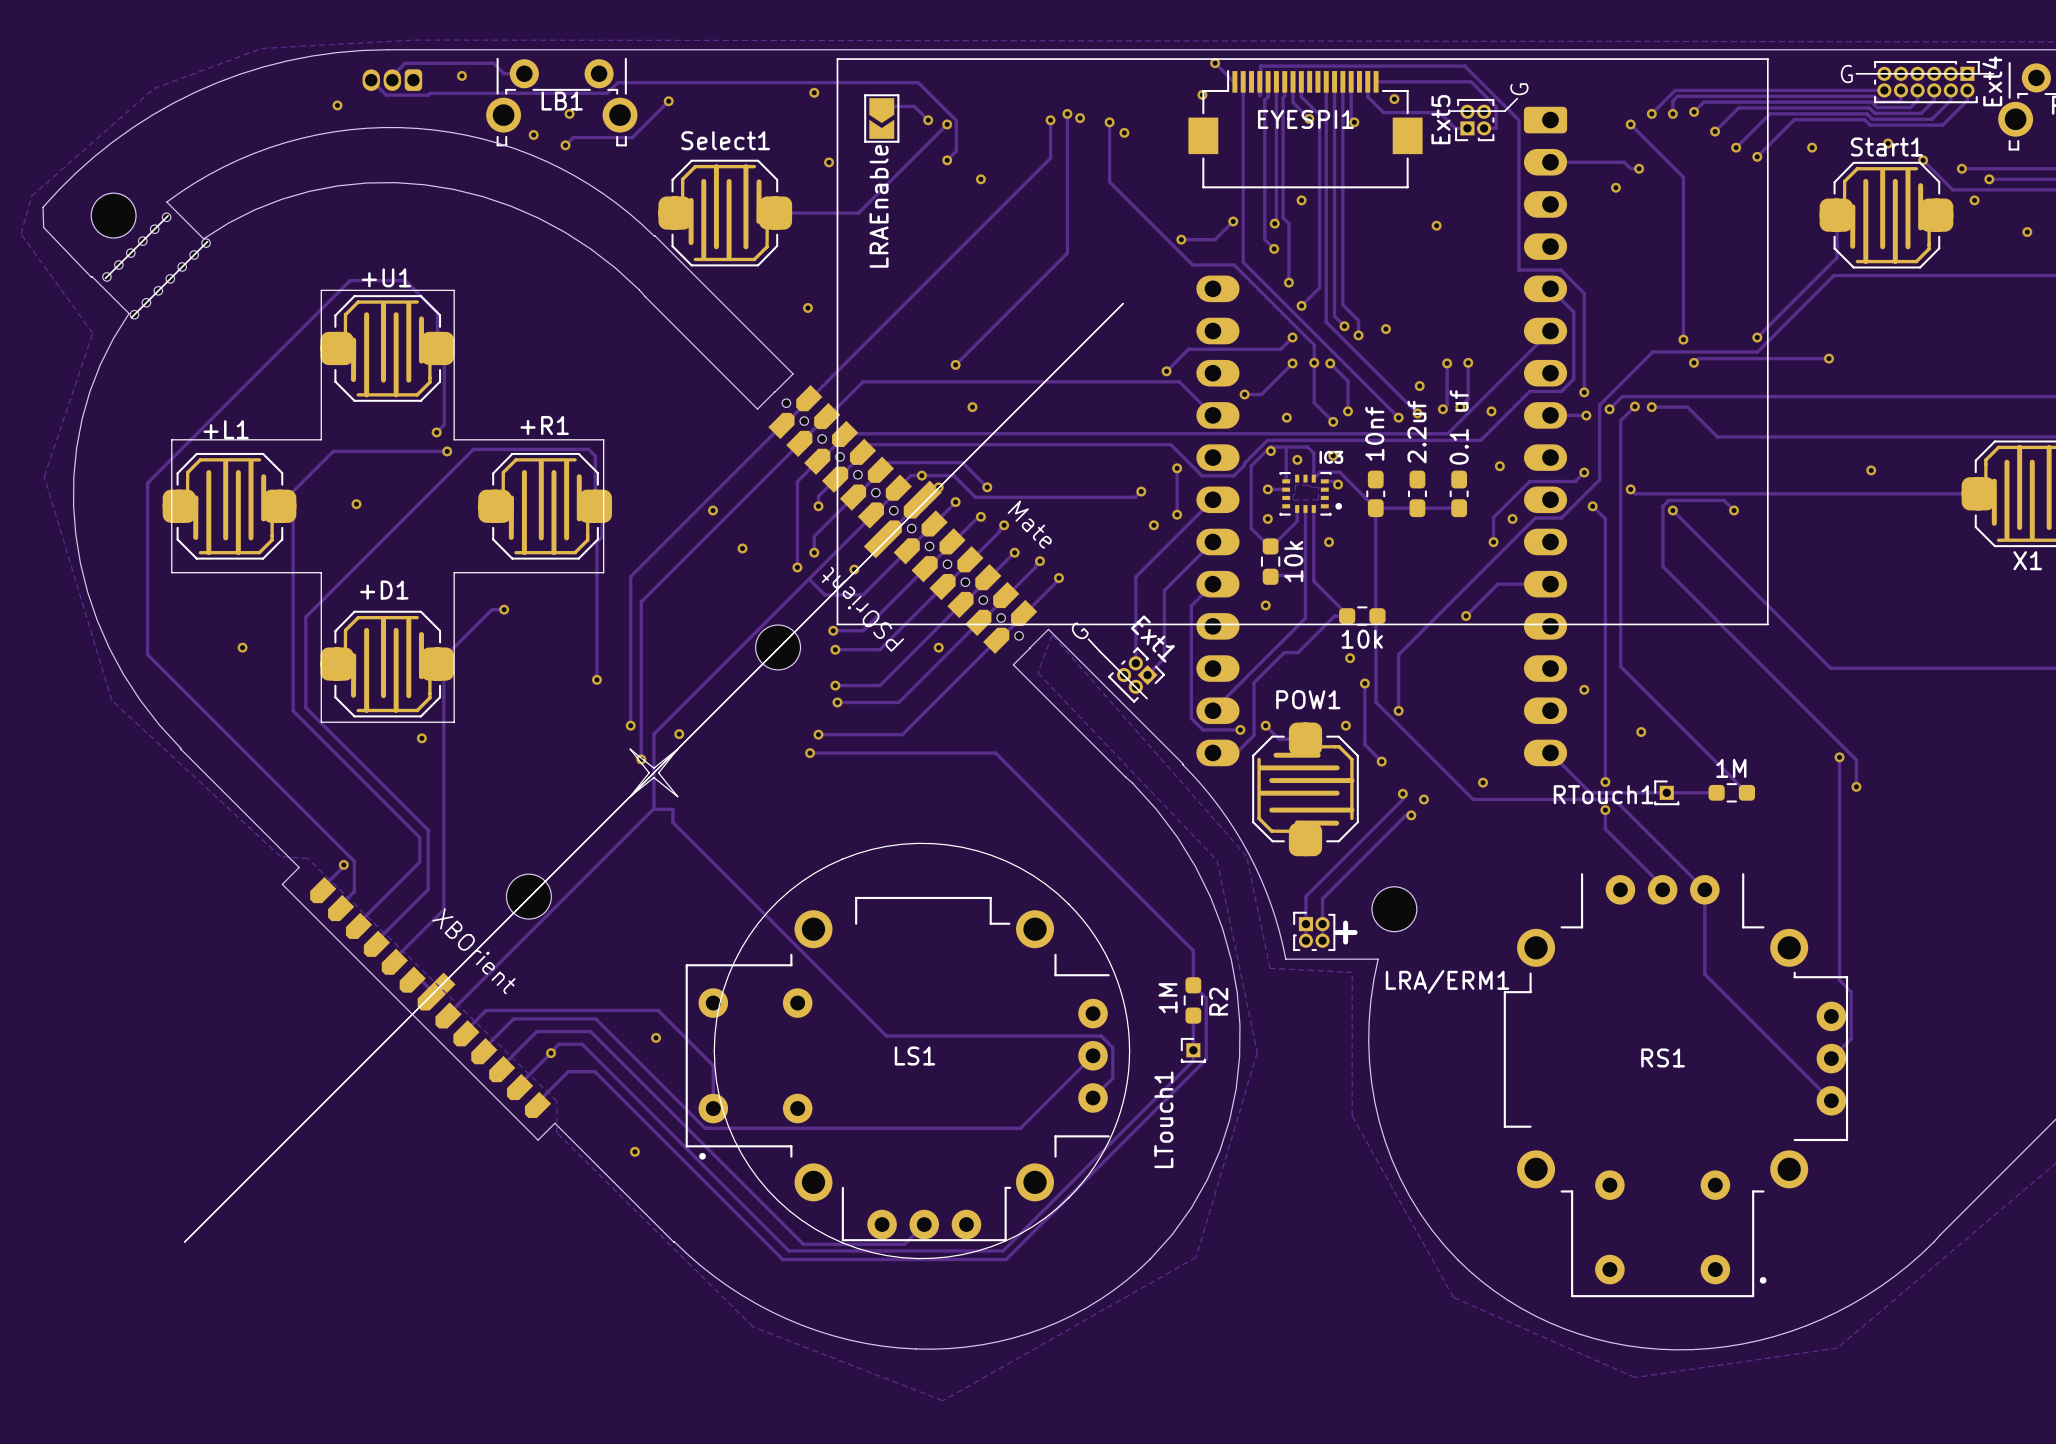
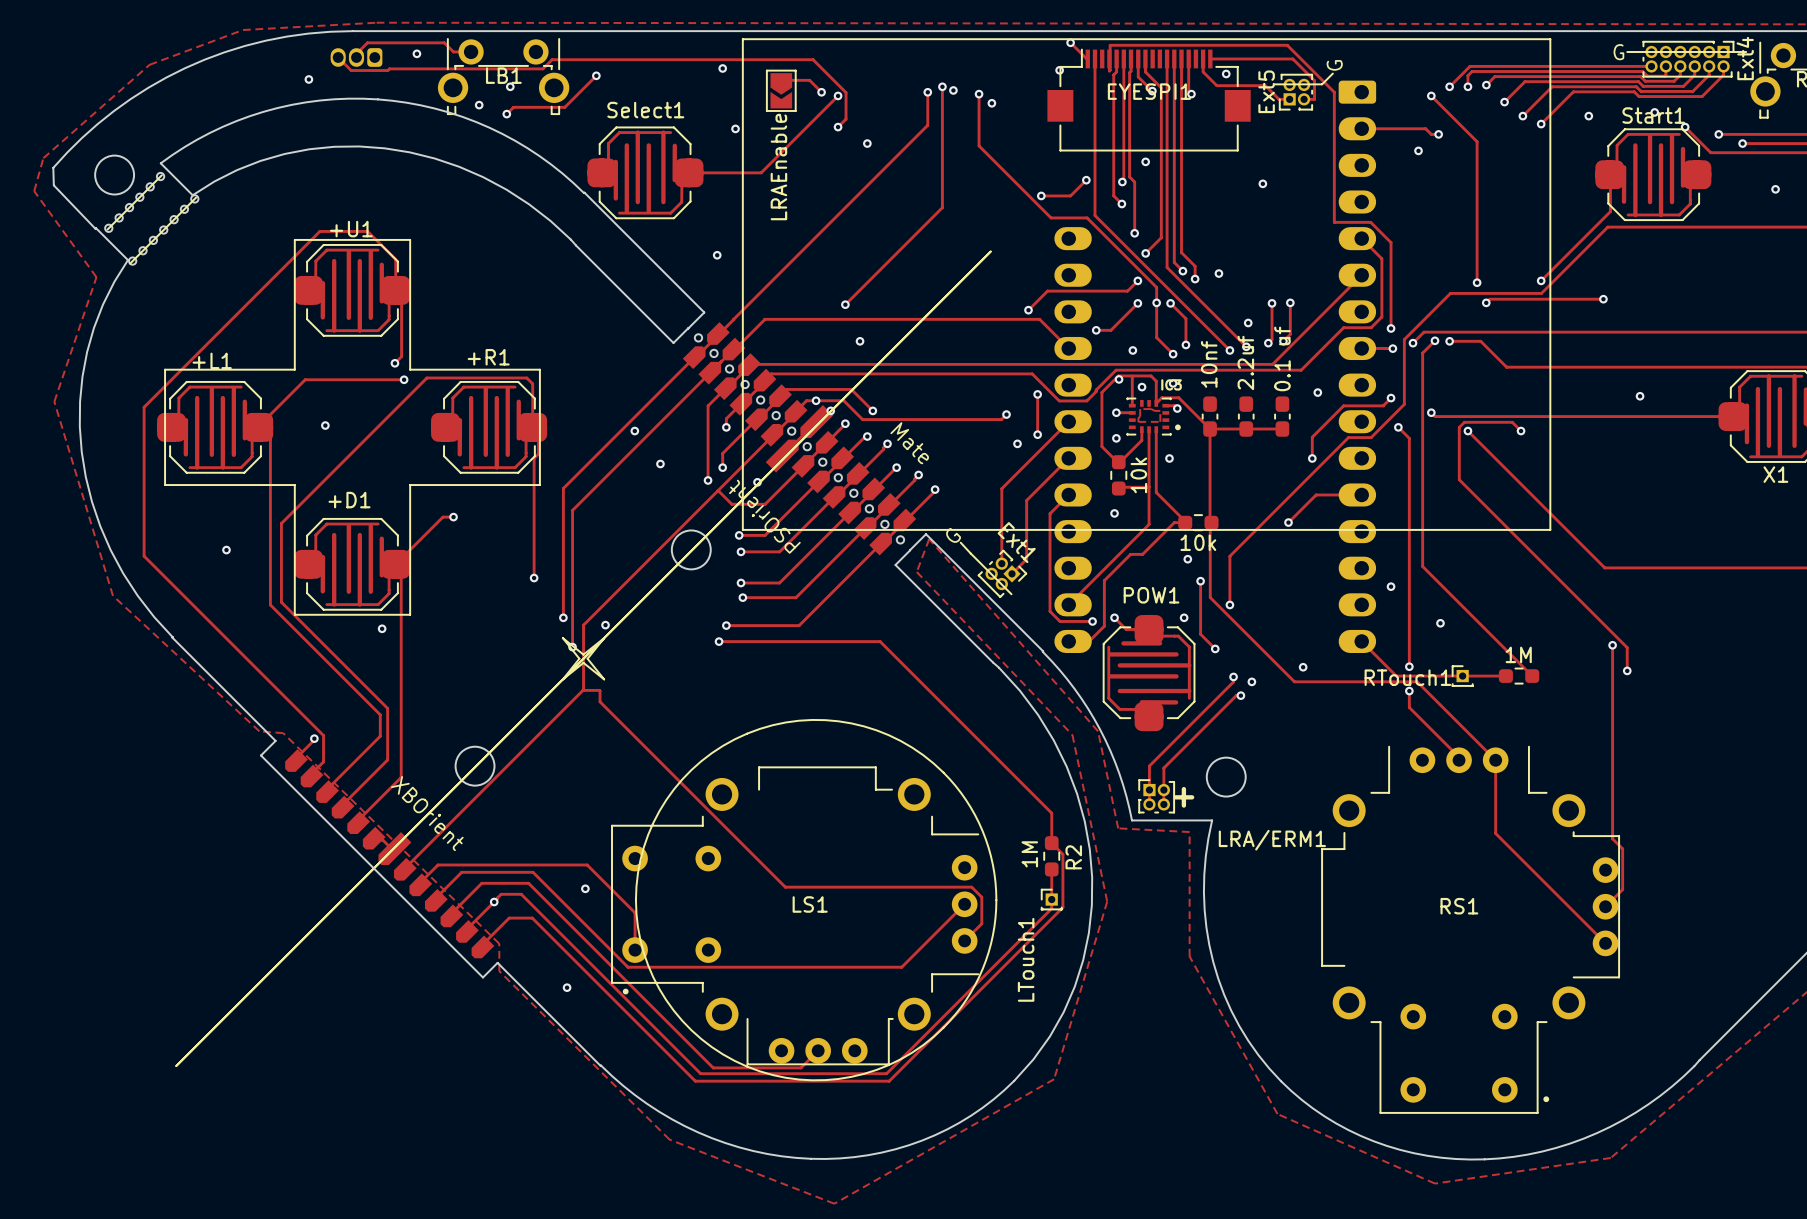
via: (1974, 200) -> none
via: (1491, 411) -> none
via: (1512, 518) -> none
via: (938, 647) -> none

